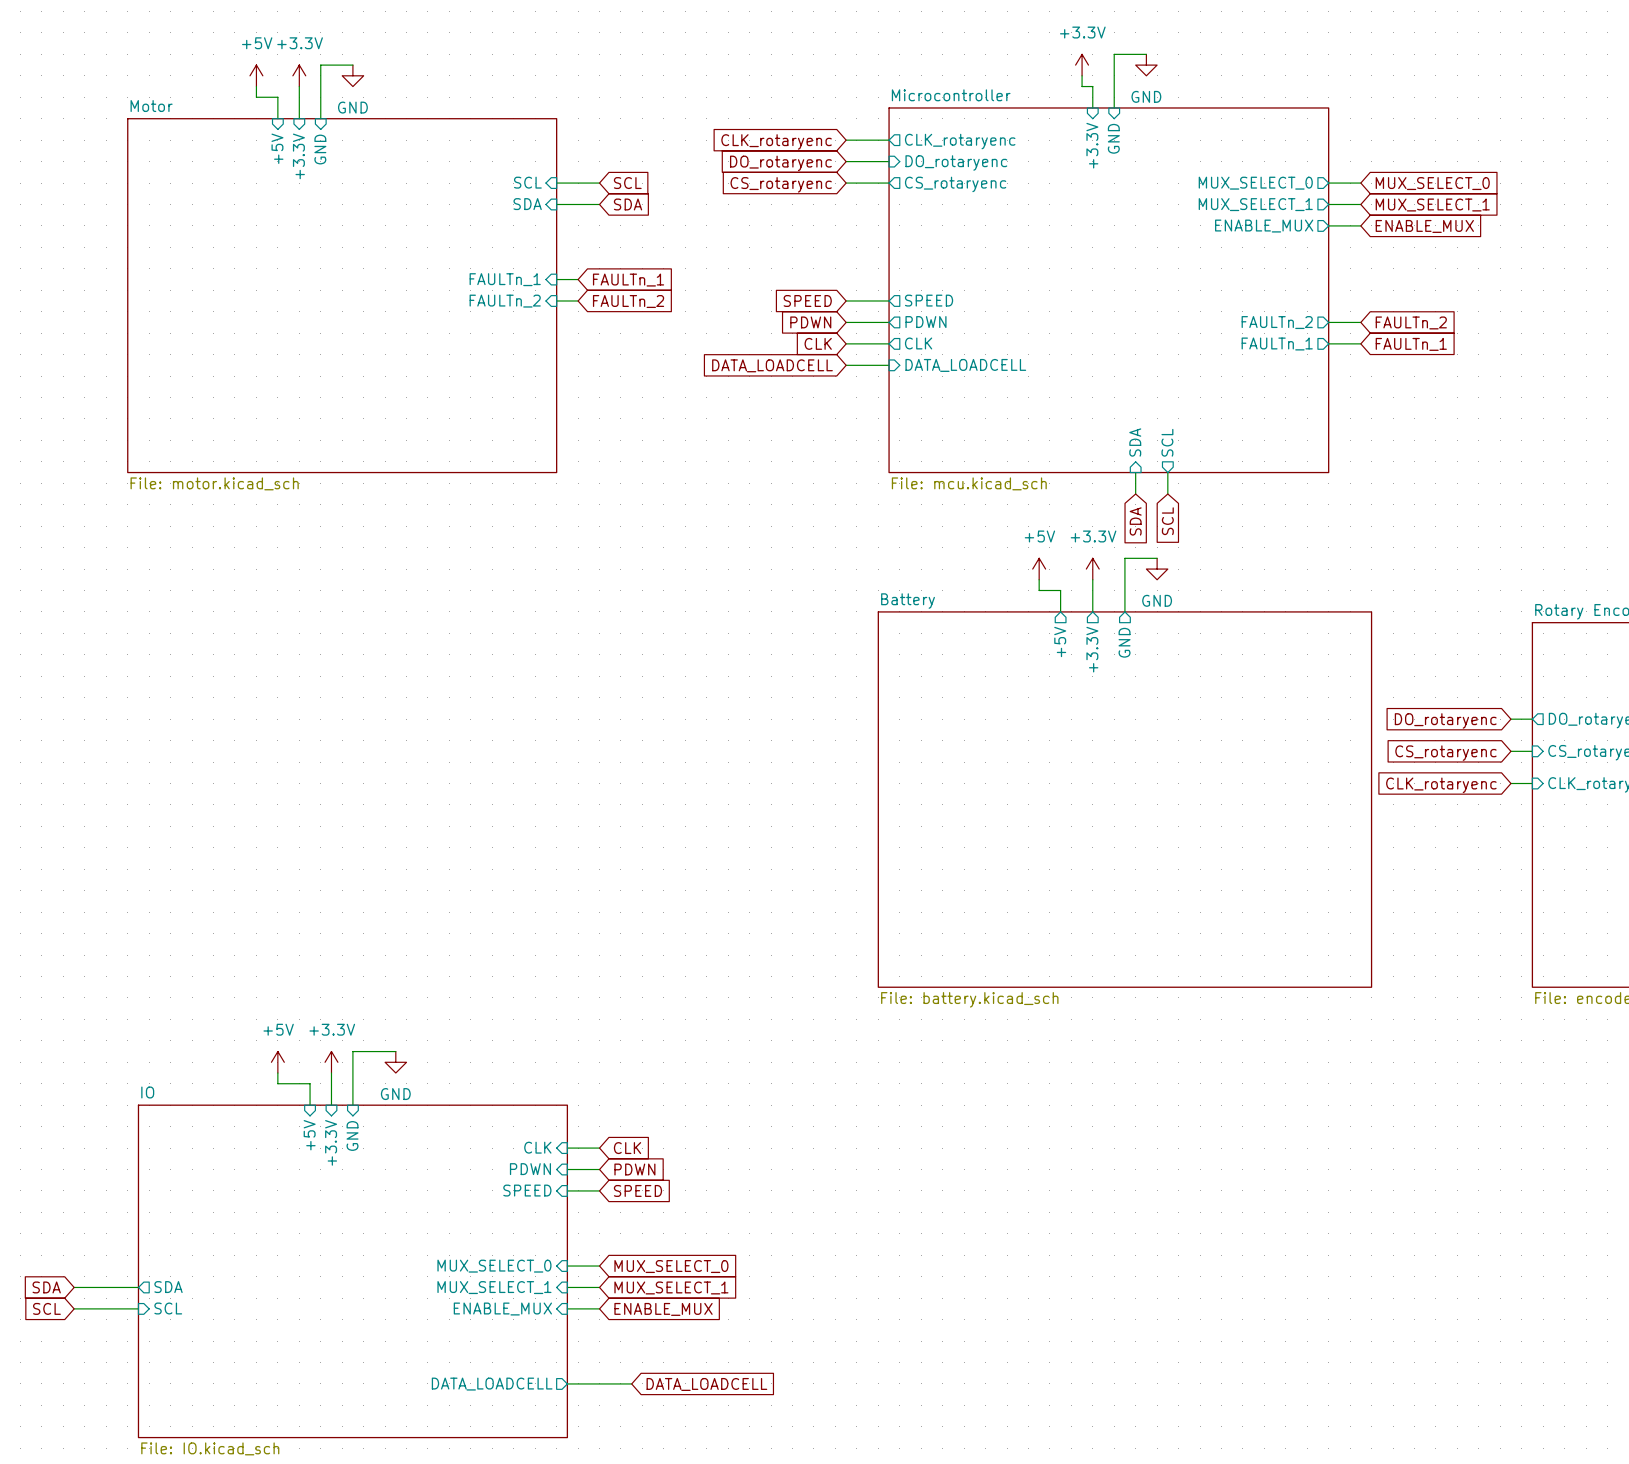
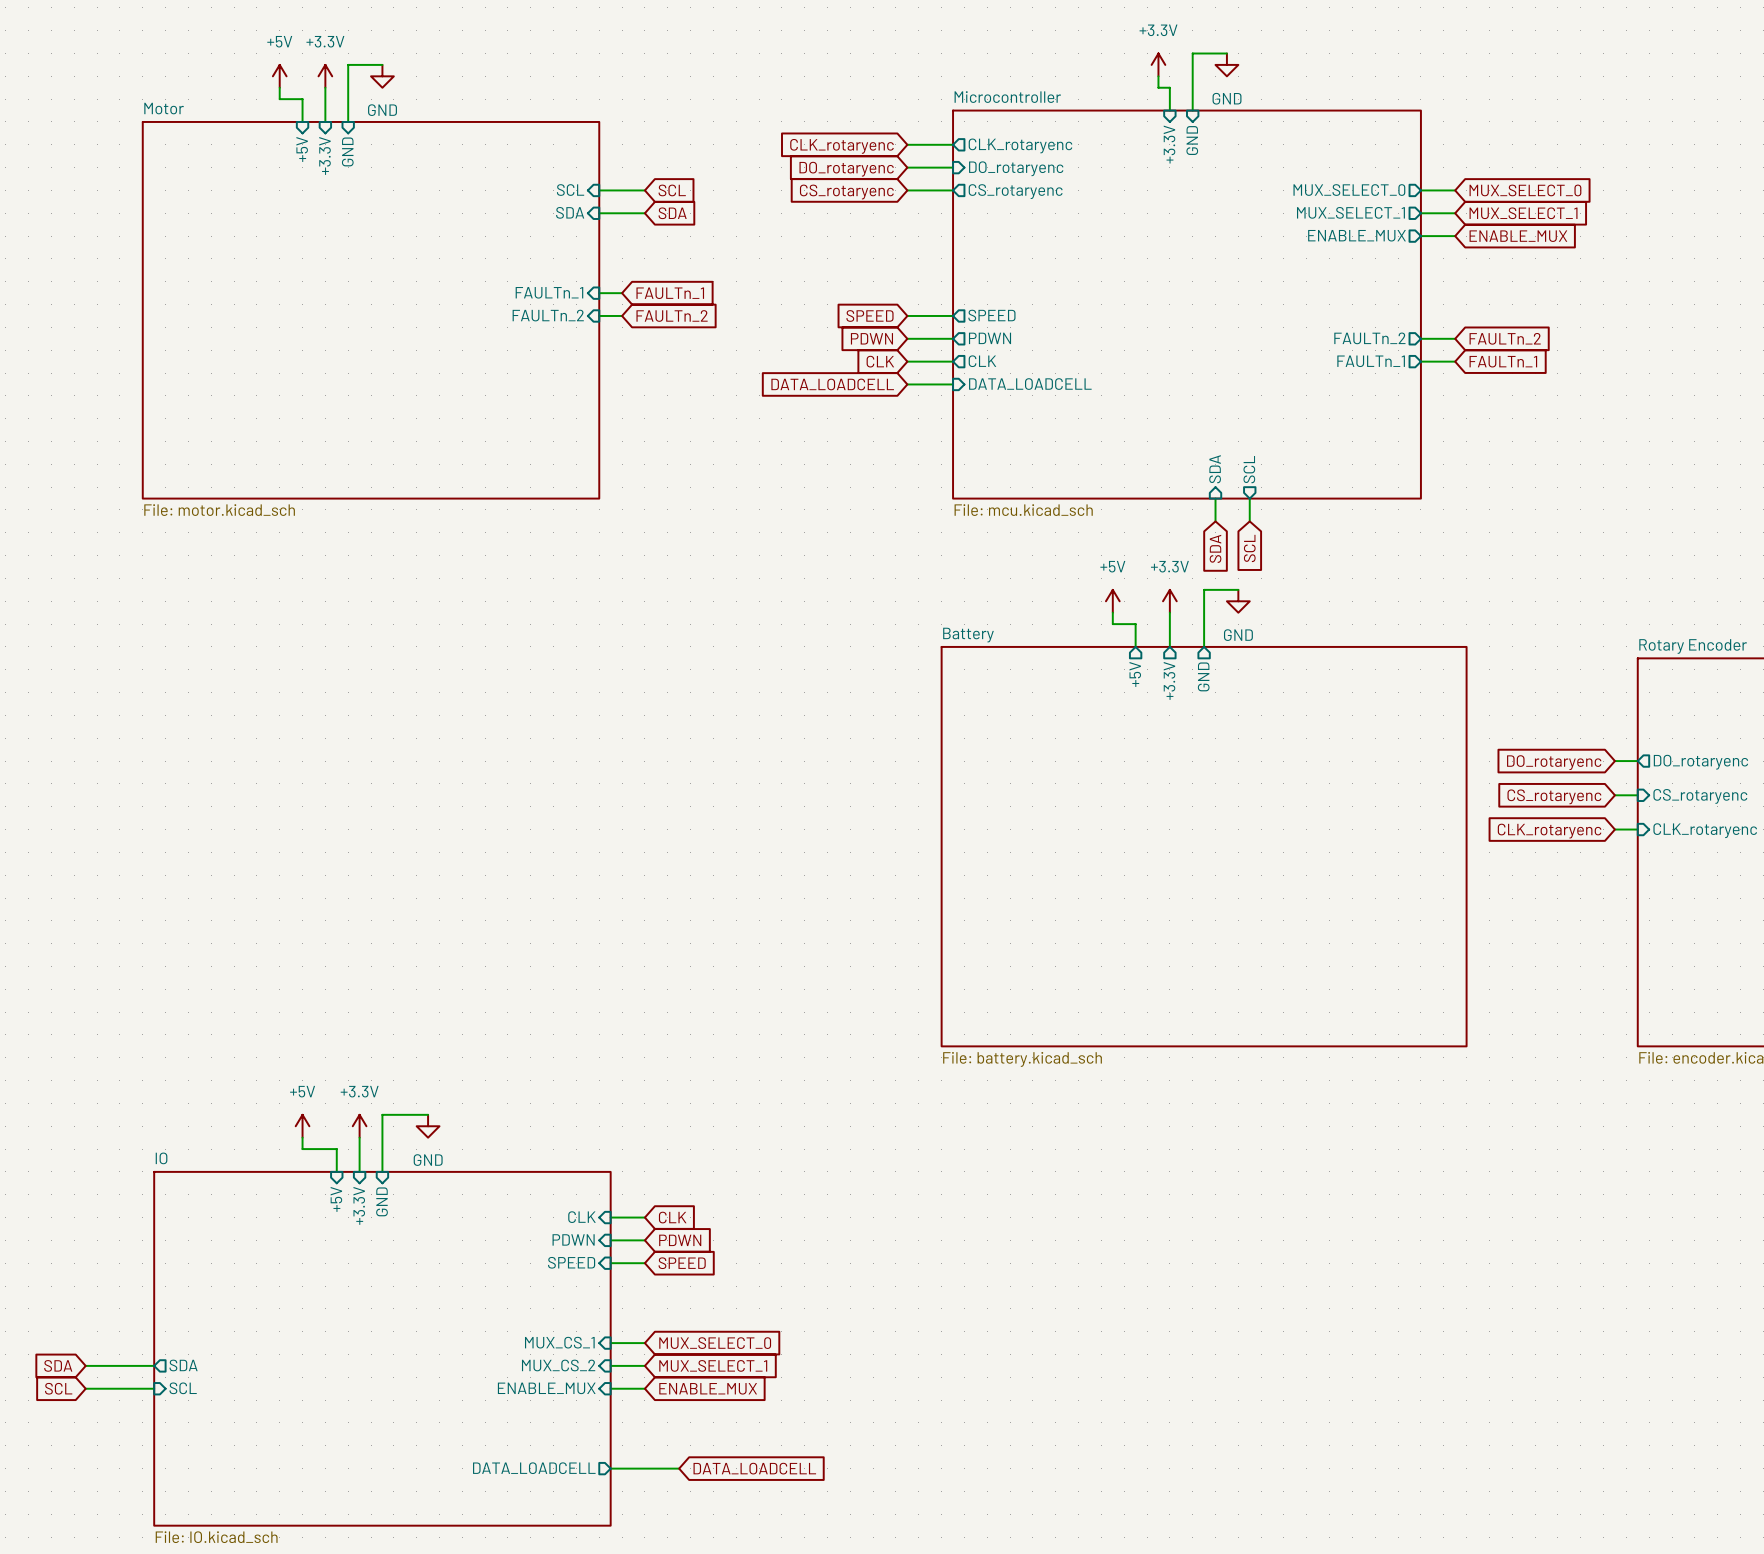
sheet pin: MUX_SELECT_0 (494, 1266) -> MUX_CS_1 (559, 1342)
sheet pin: MUX_SELECT_1 (494, 1287) -> MUX_CS_2 (558, 1365)

